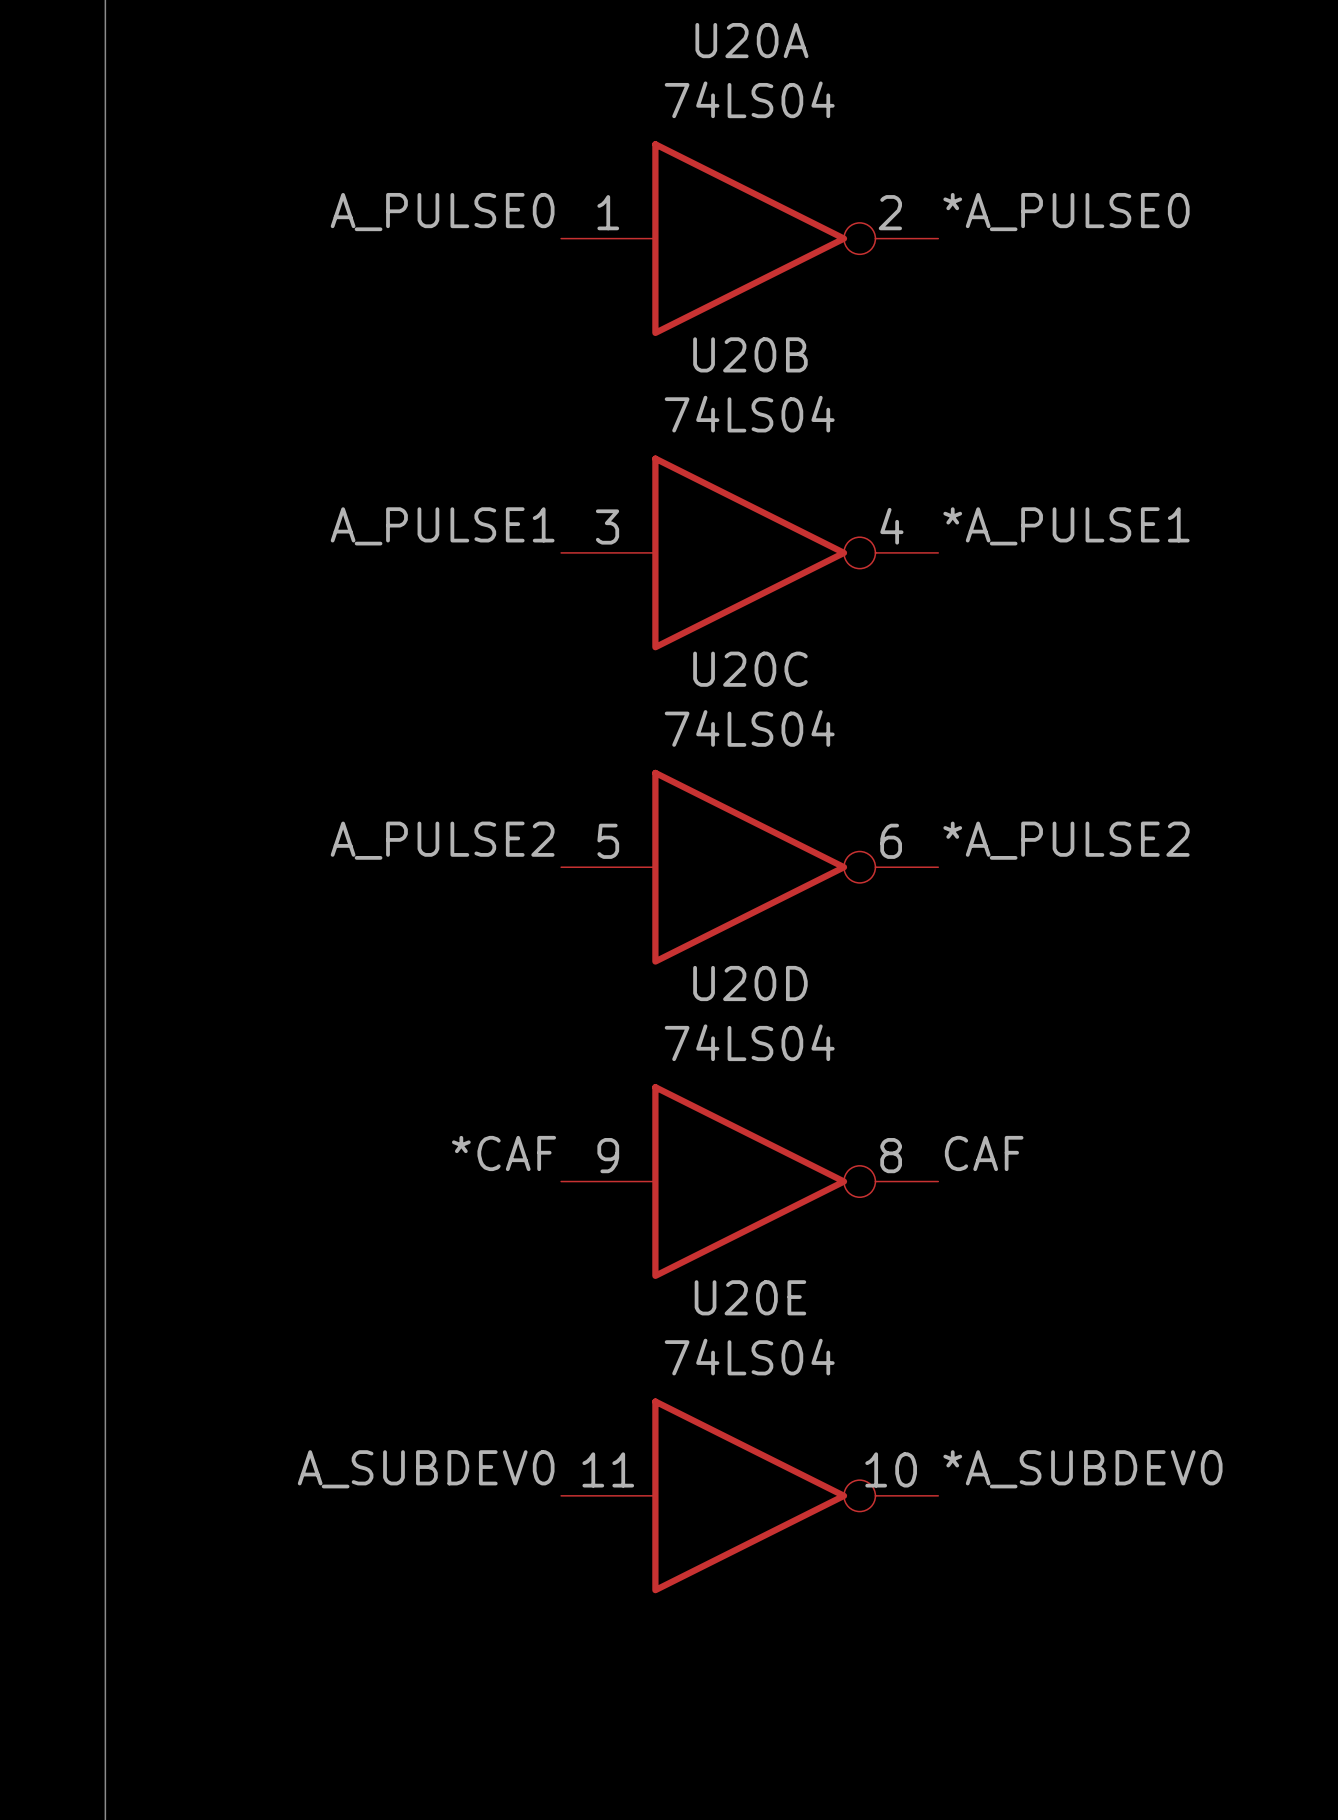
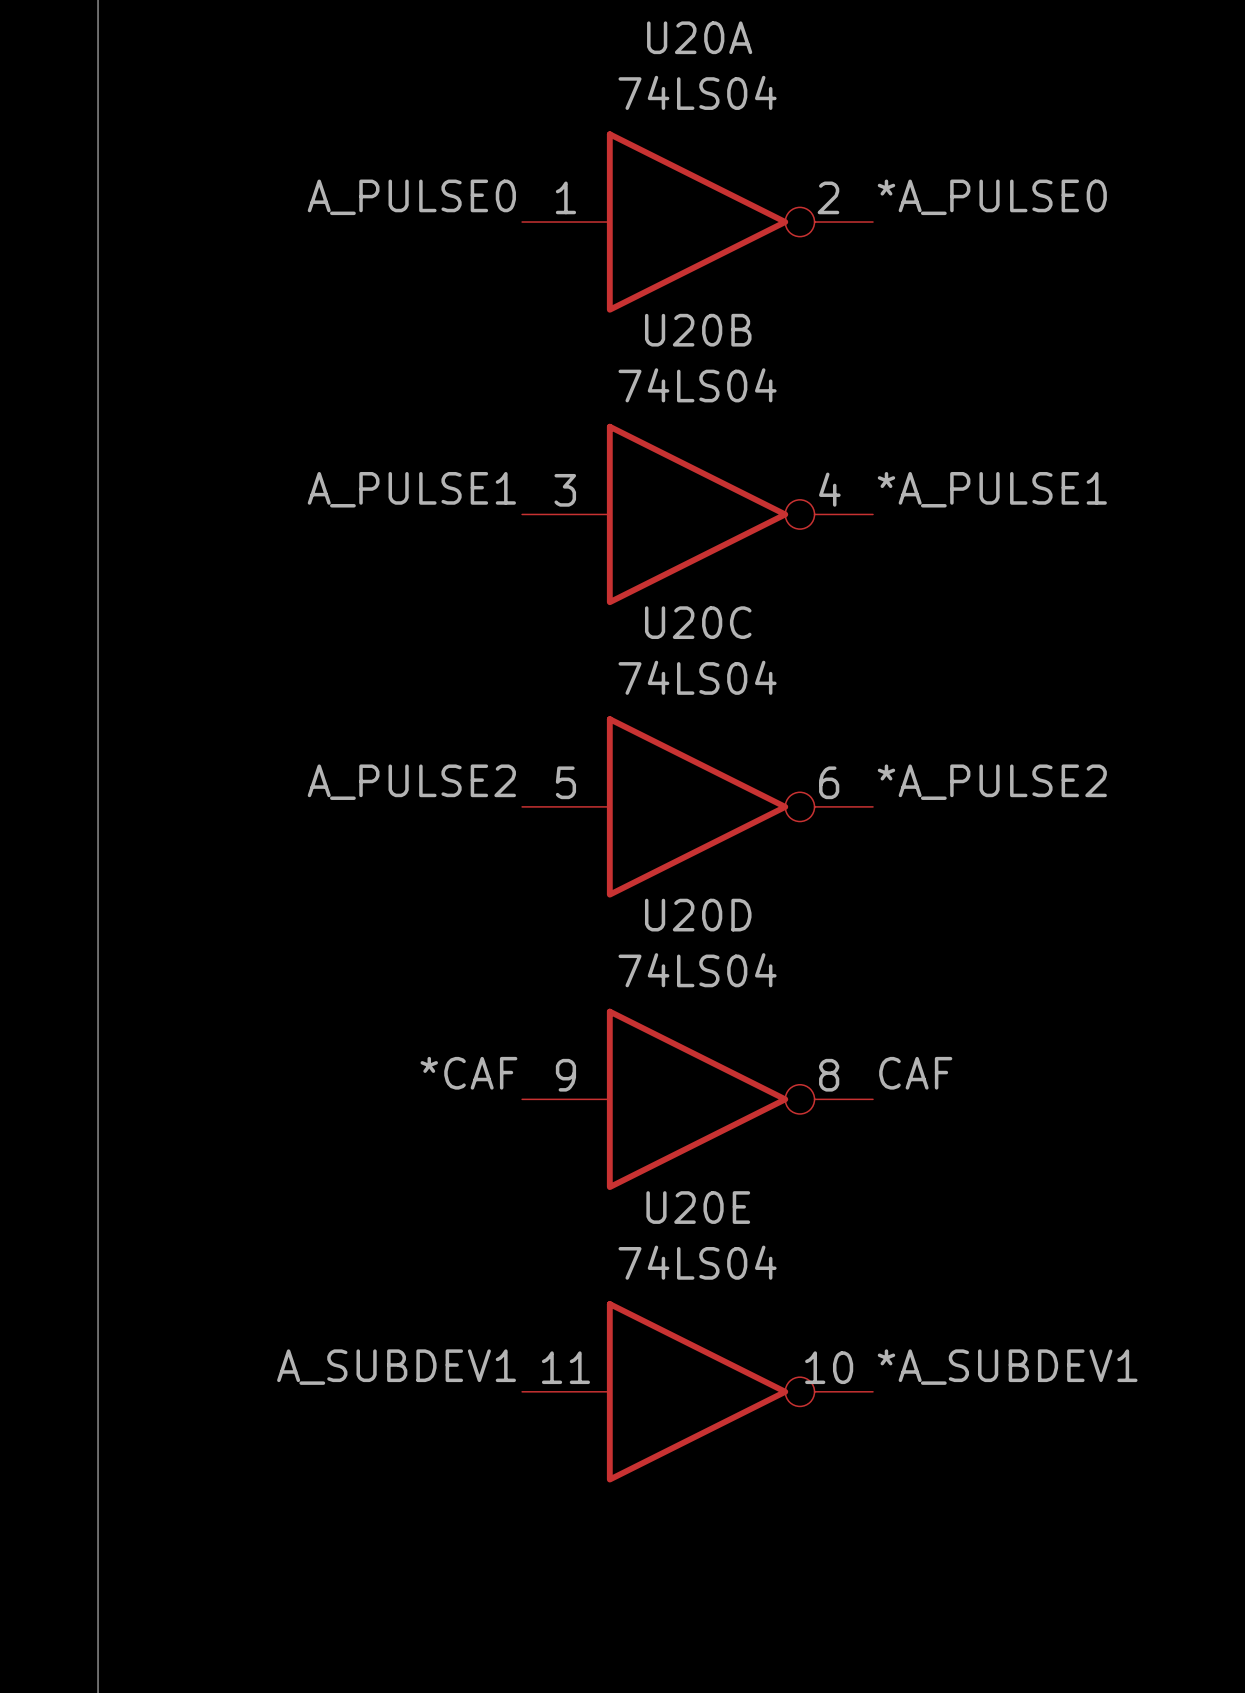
label: A_SUBDEV0 (426, 1469) -> A_SUBDEV1 (396, 1367)
label: *A_SUBDEV0 (1082, 1469) -> *A_SUBDEV1 (1007, 1367)

